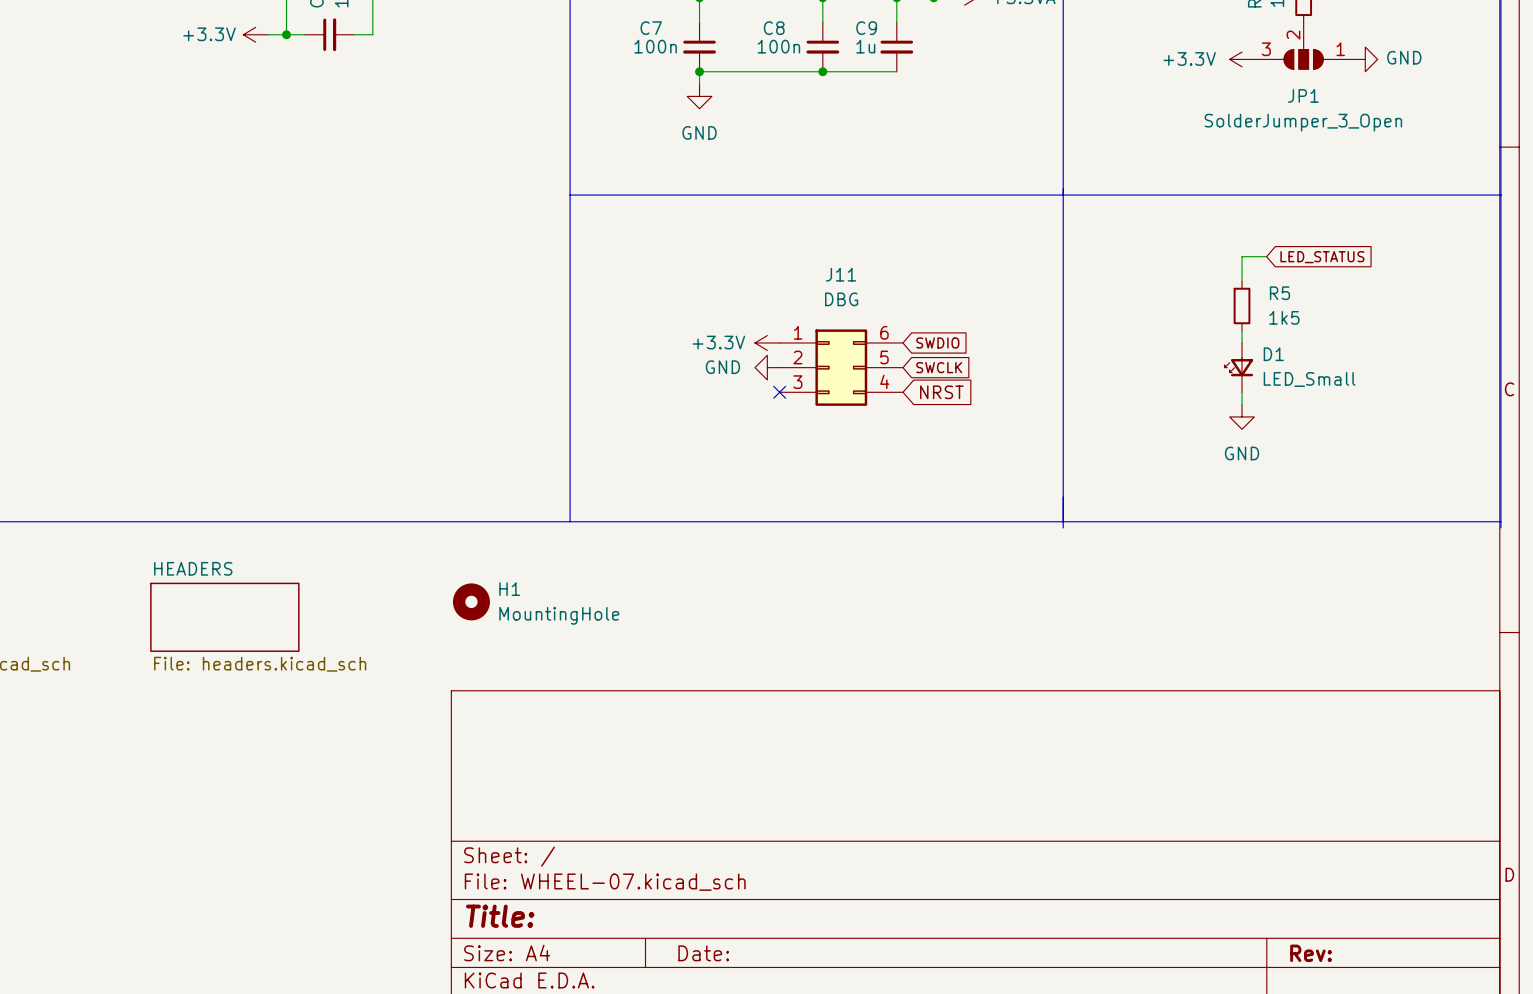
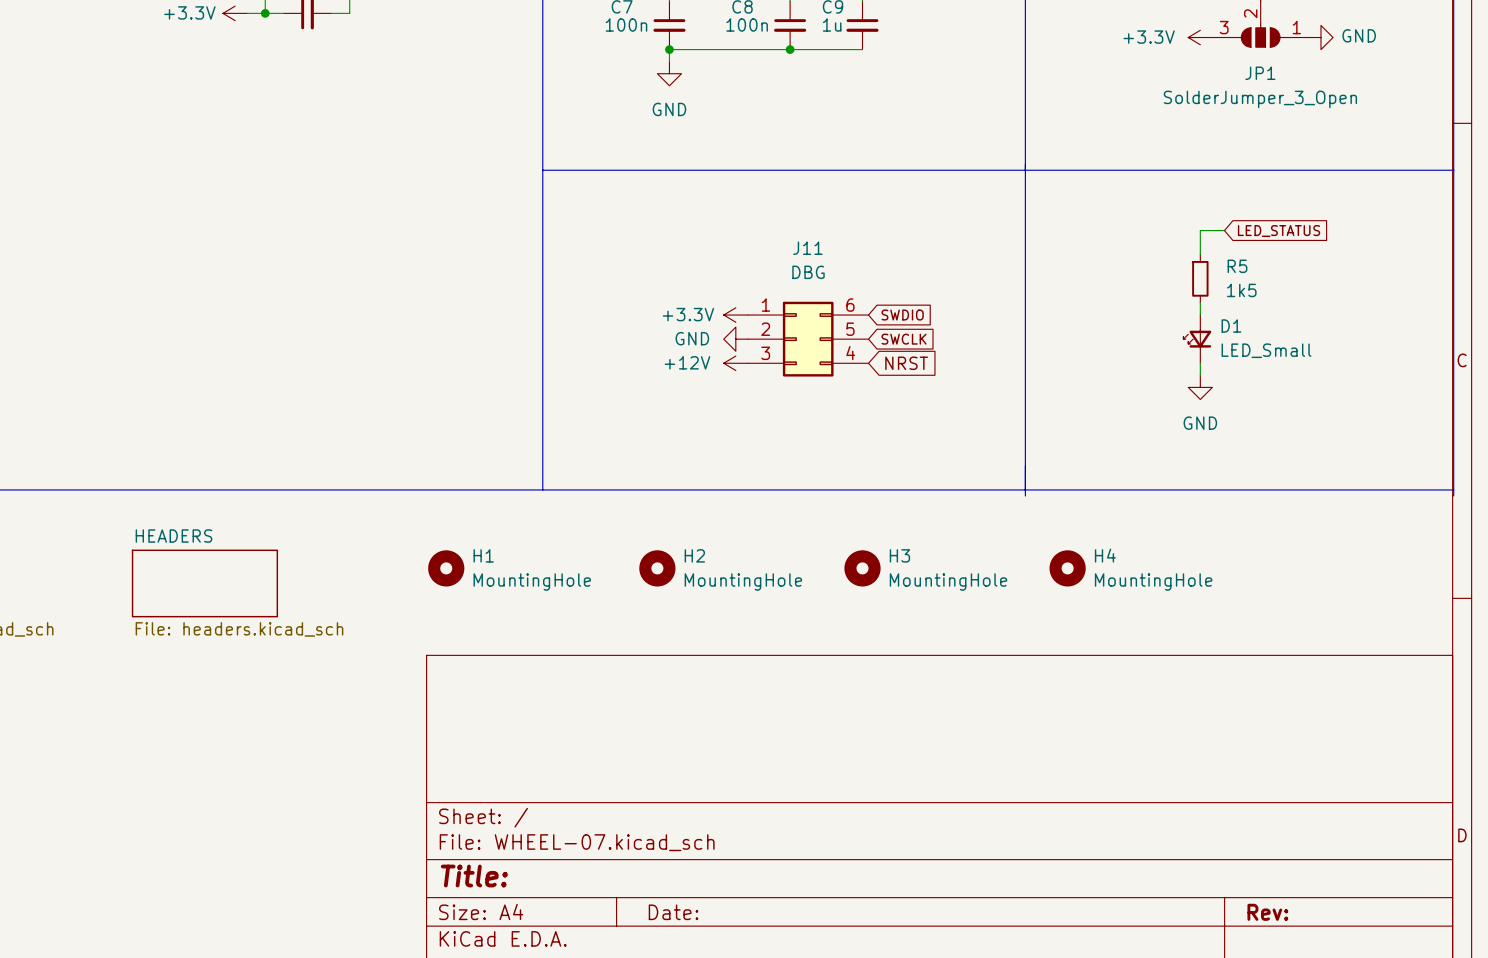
power symbol: none -> +12V (735, 363)
no-connect mark: (779, 392) -> none
H2: none -> MountingHole (657, 568)
H3: none -> MountingHole (862, 568)
H4: none -> MountingHole (1067, 568)

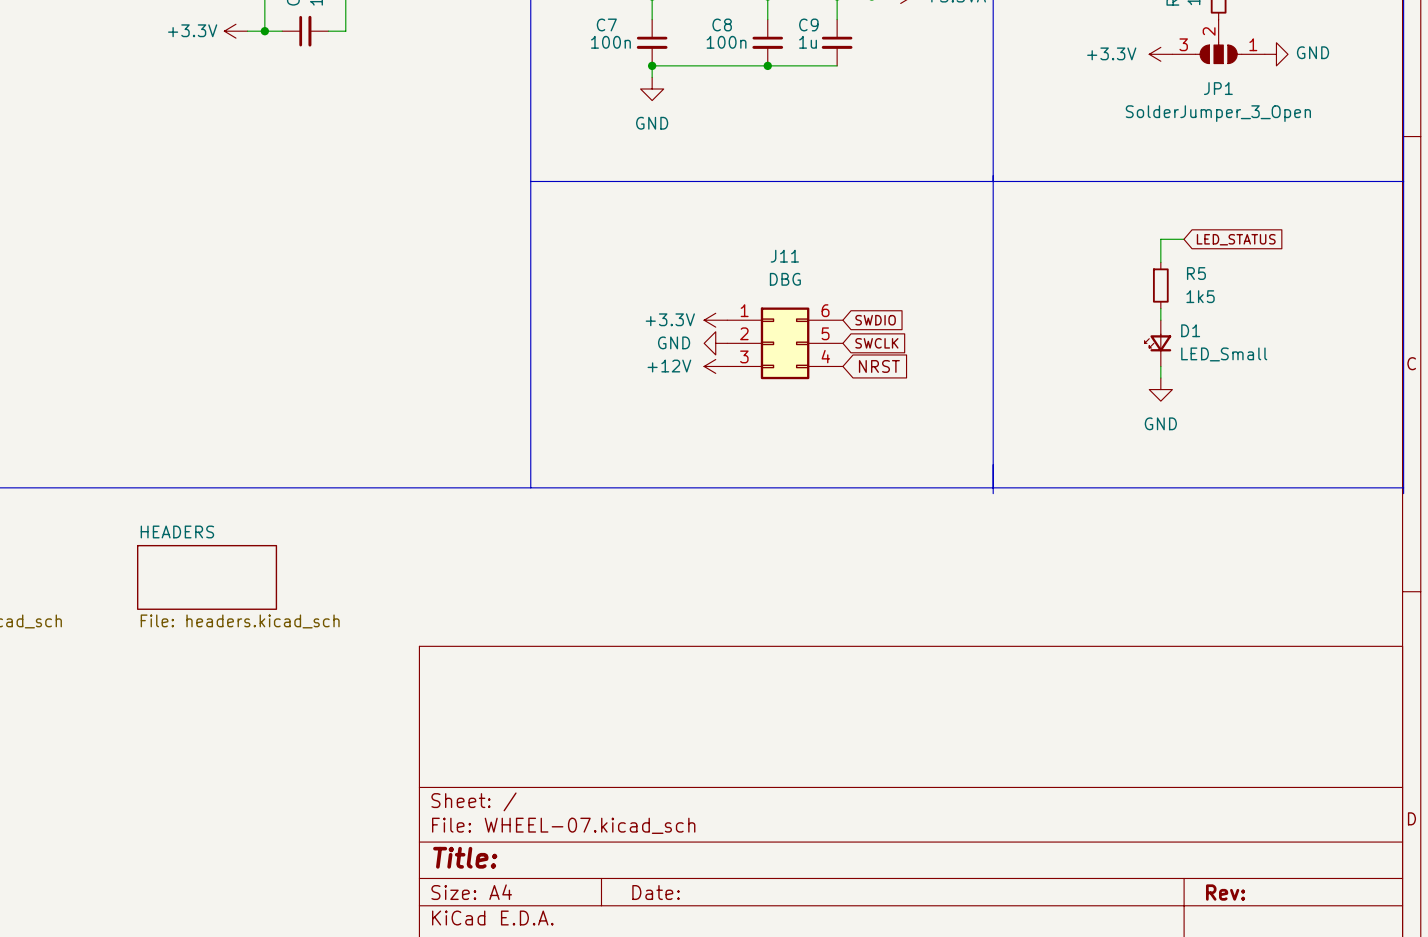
H1: MountingHole (446, 568) -> none
H2: MountingHole (657, 568) -> none
H3: MountingHole (862, 568) -> none
H4: MountingHole (1067, 568) -> none

